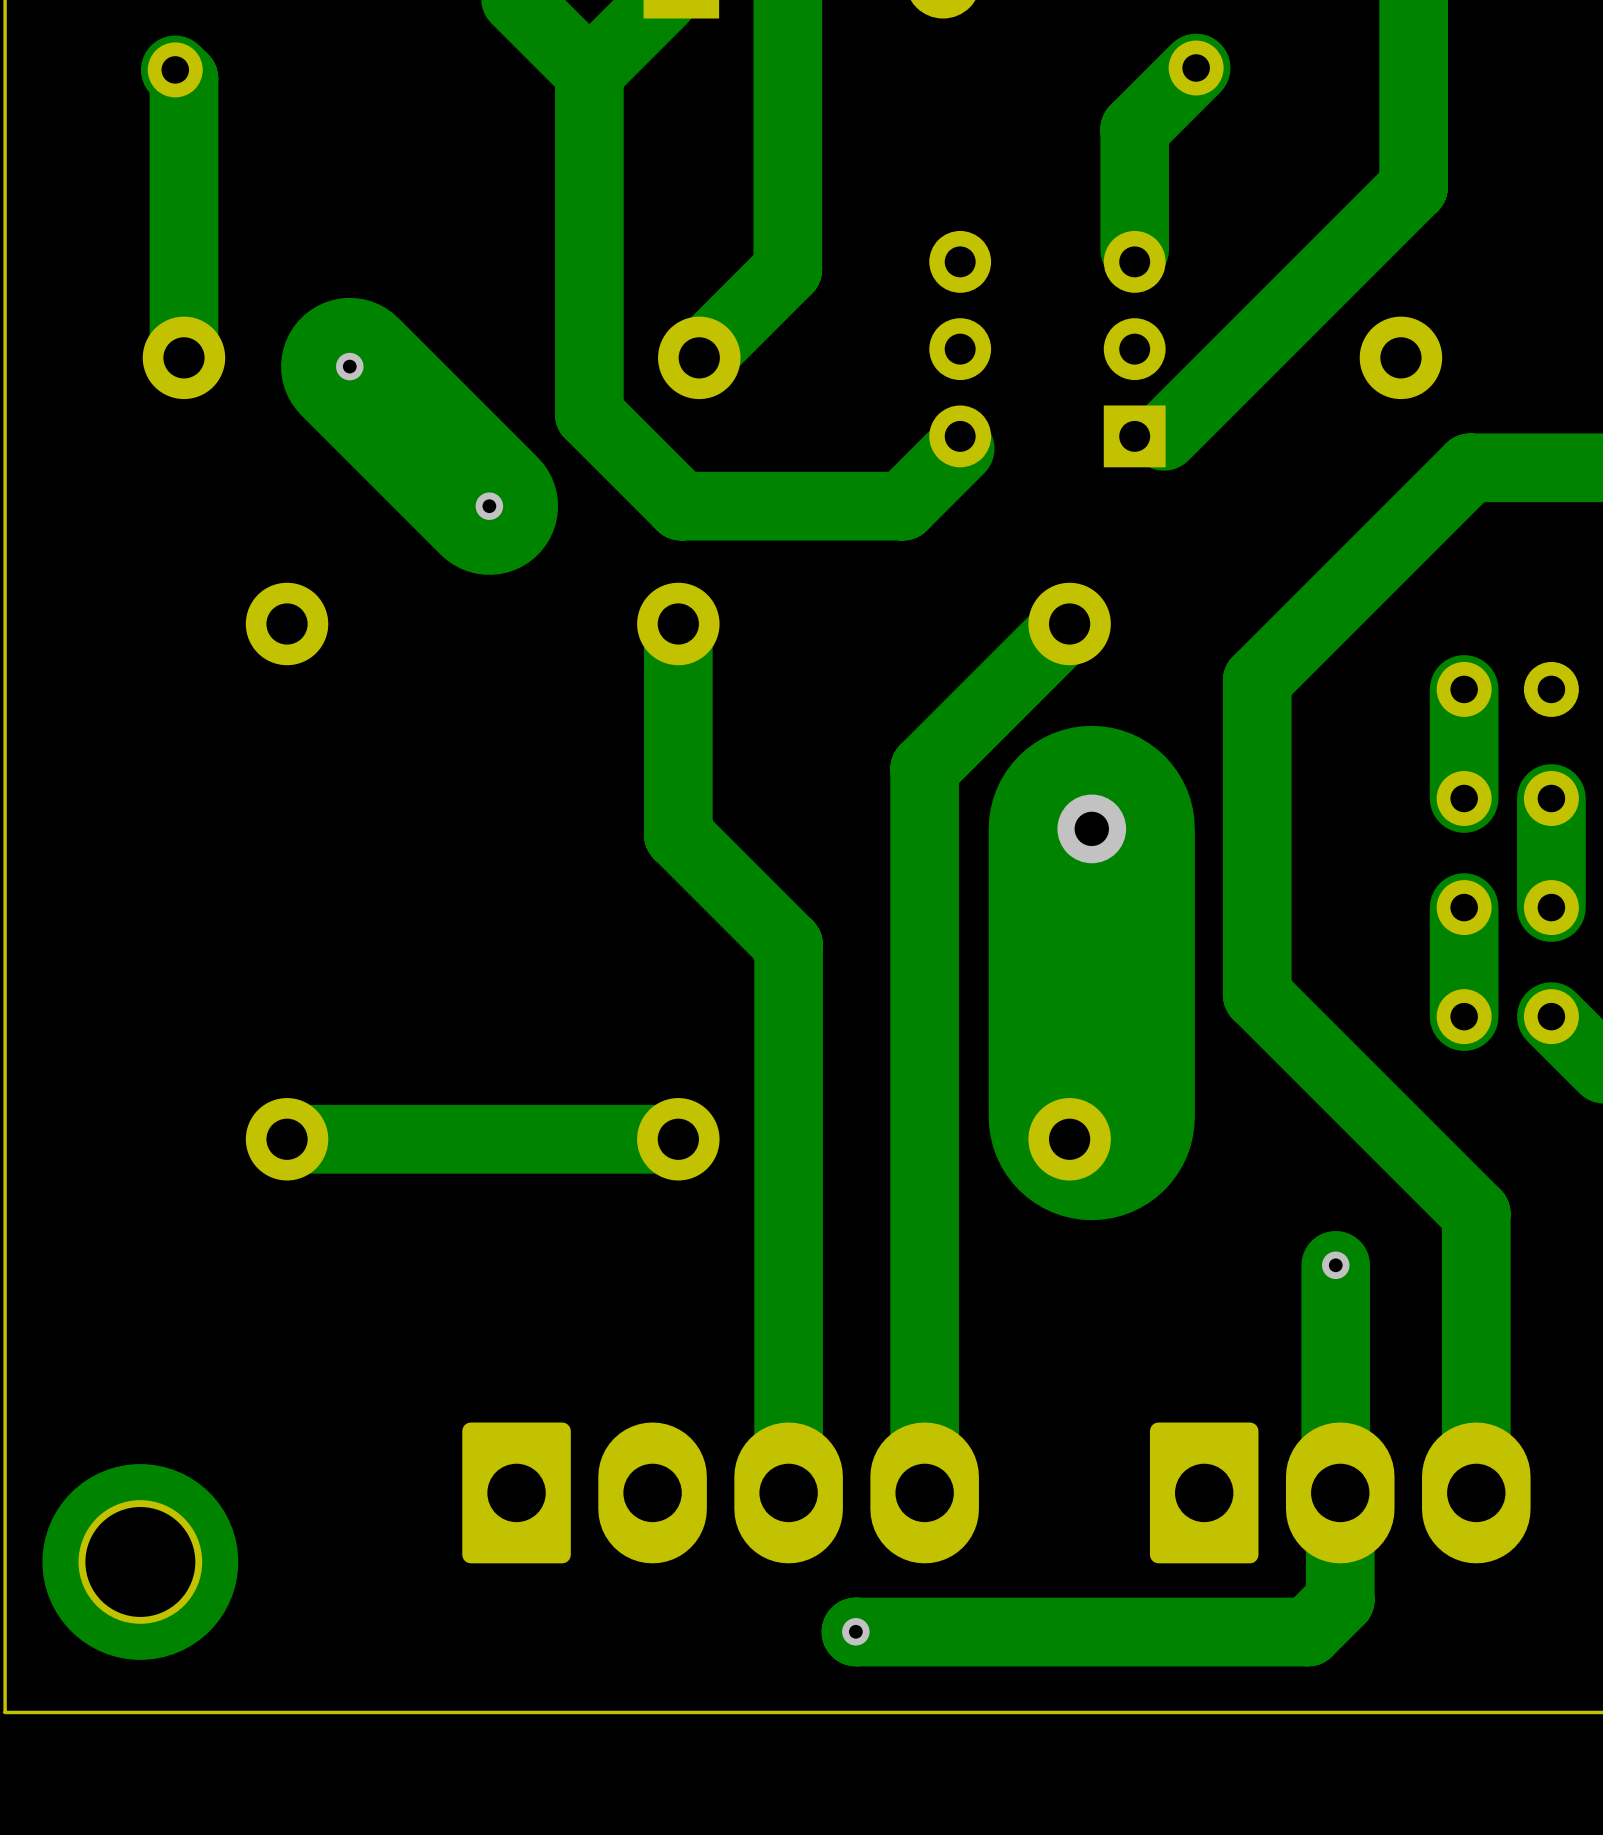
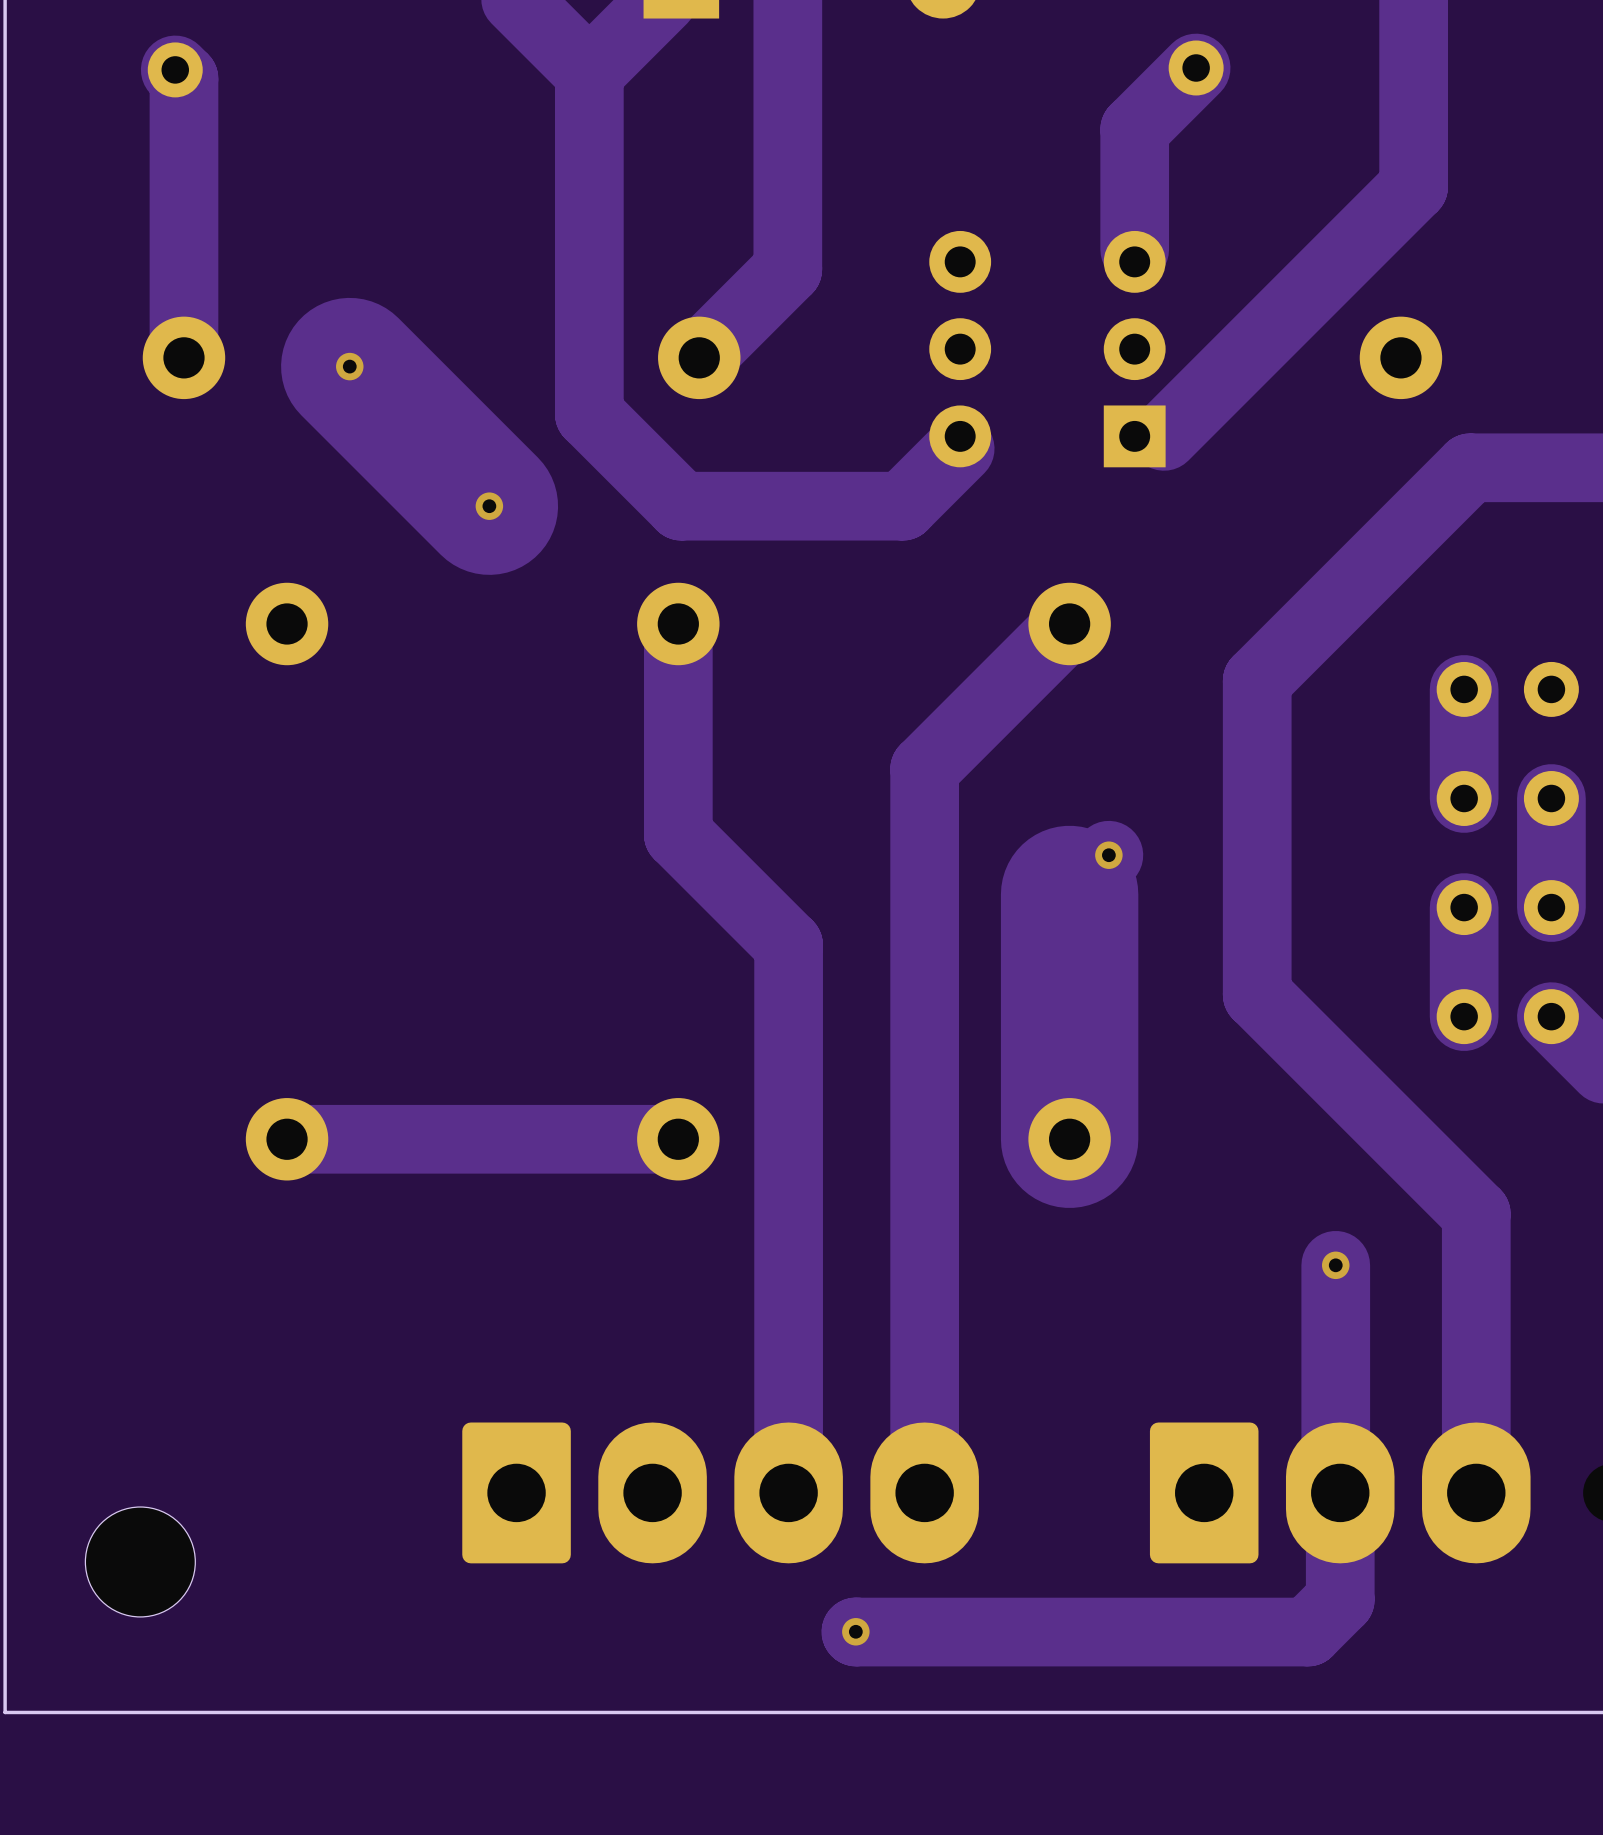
via size: [1057, 794, 1127, 864] -> [1095, 841, 1123, 869]
track: (1091, 828) (1091, 1117) (1069, 1139) -> (1108, 855) (1069, 894) (1069, 1139)
part footprint: [42, 1464, 239, 1660] -> [85, 1507, 196, 1617]

